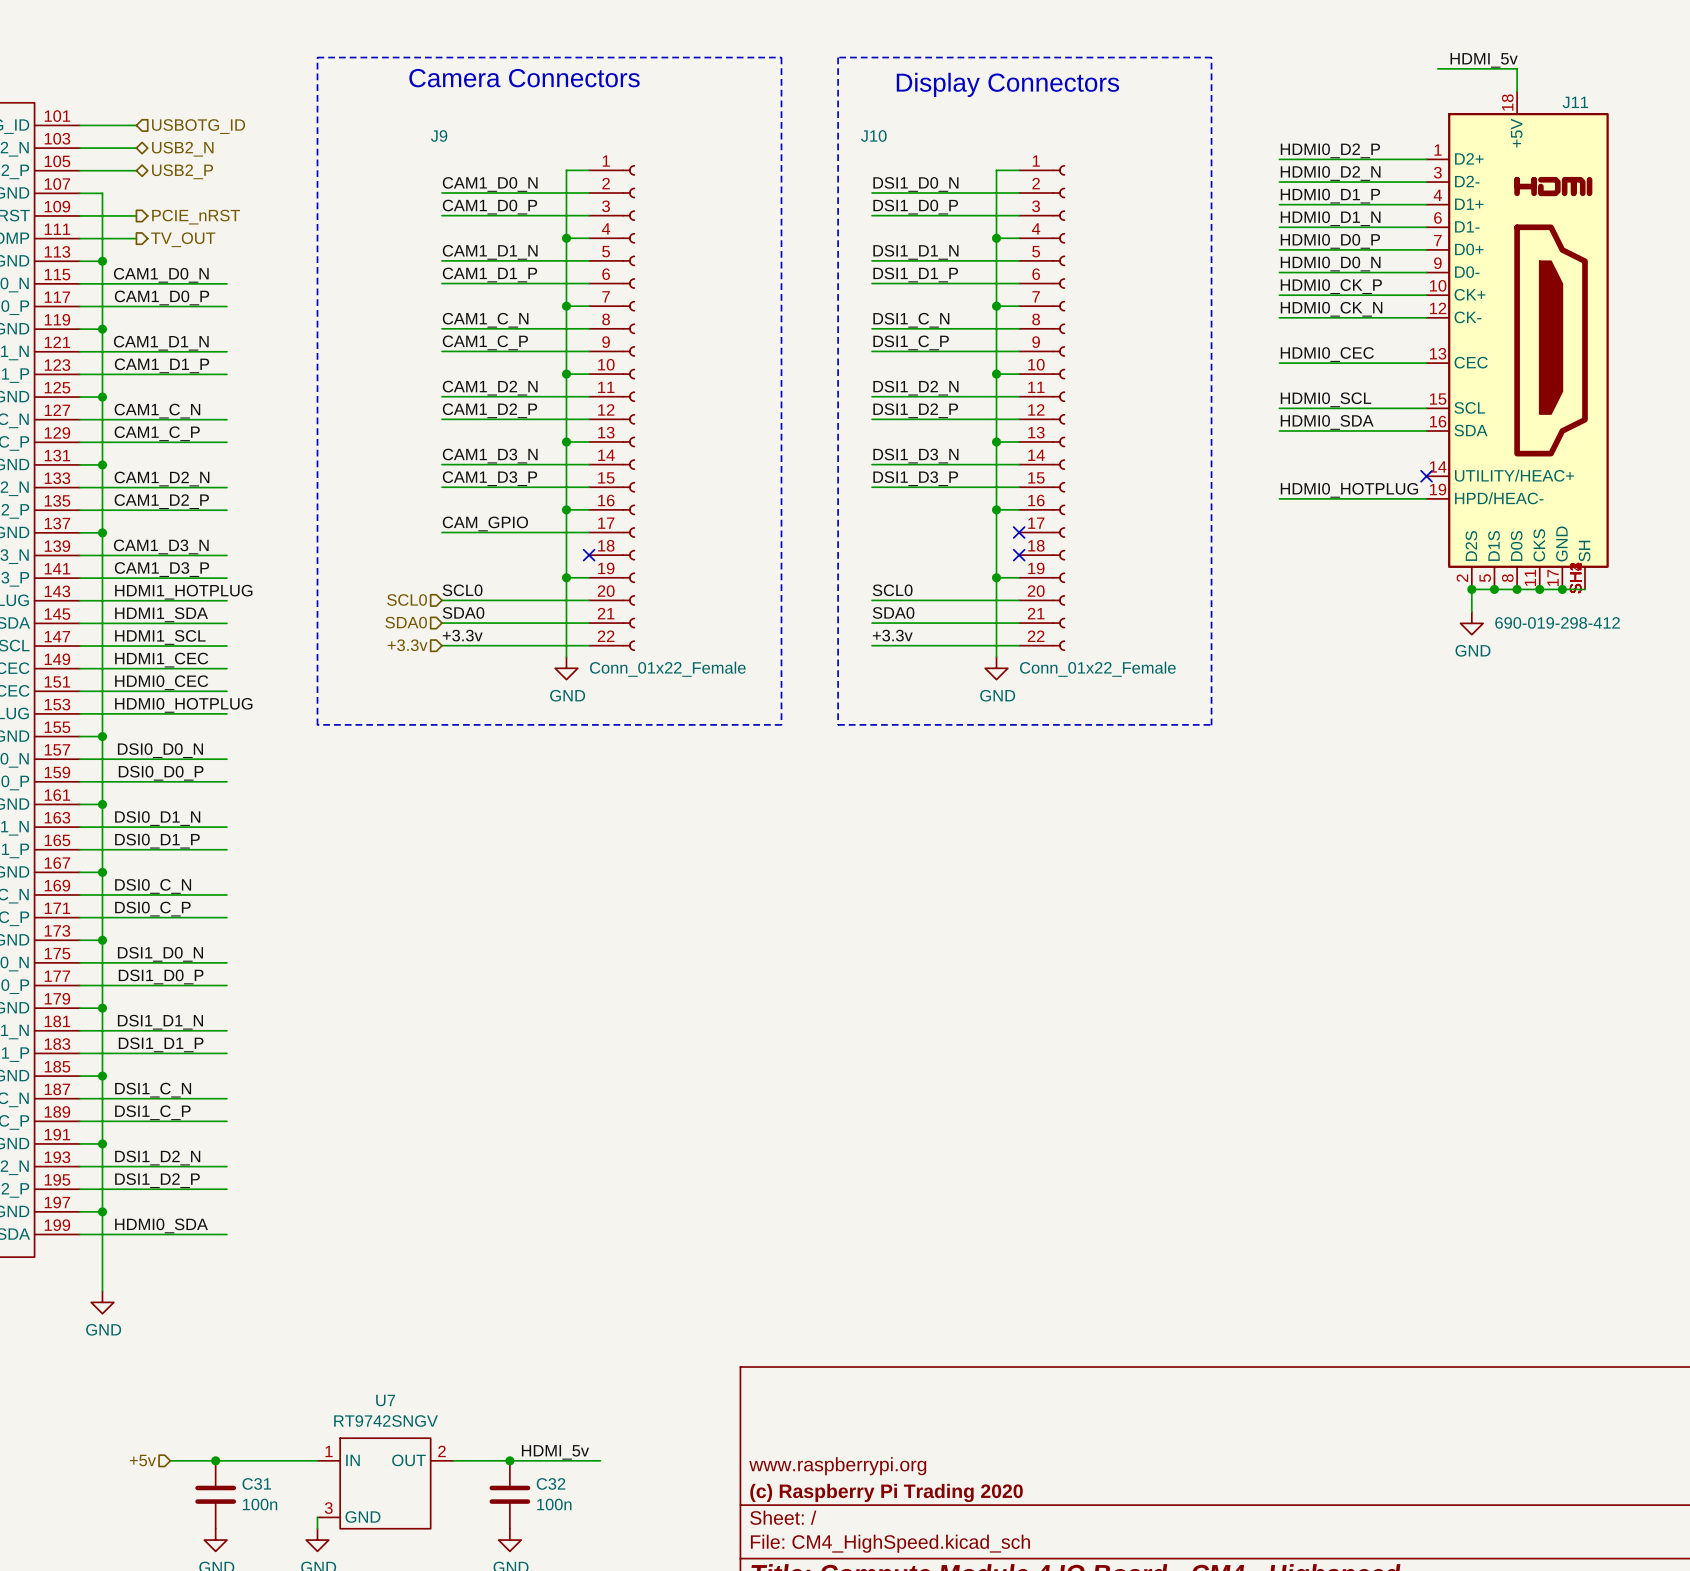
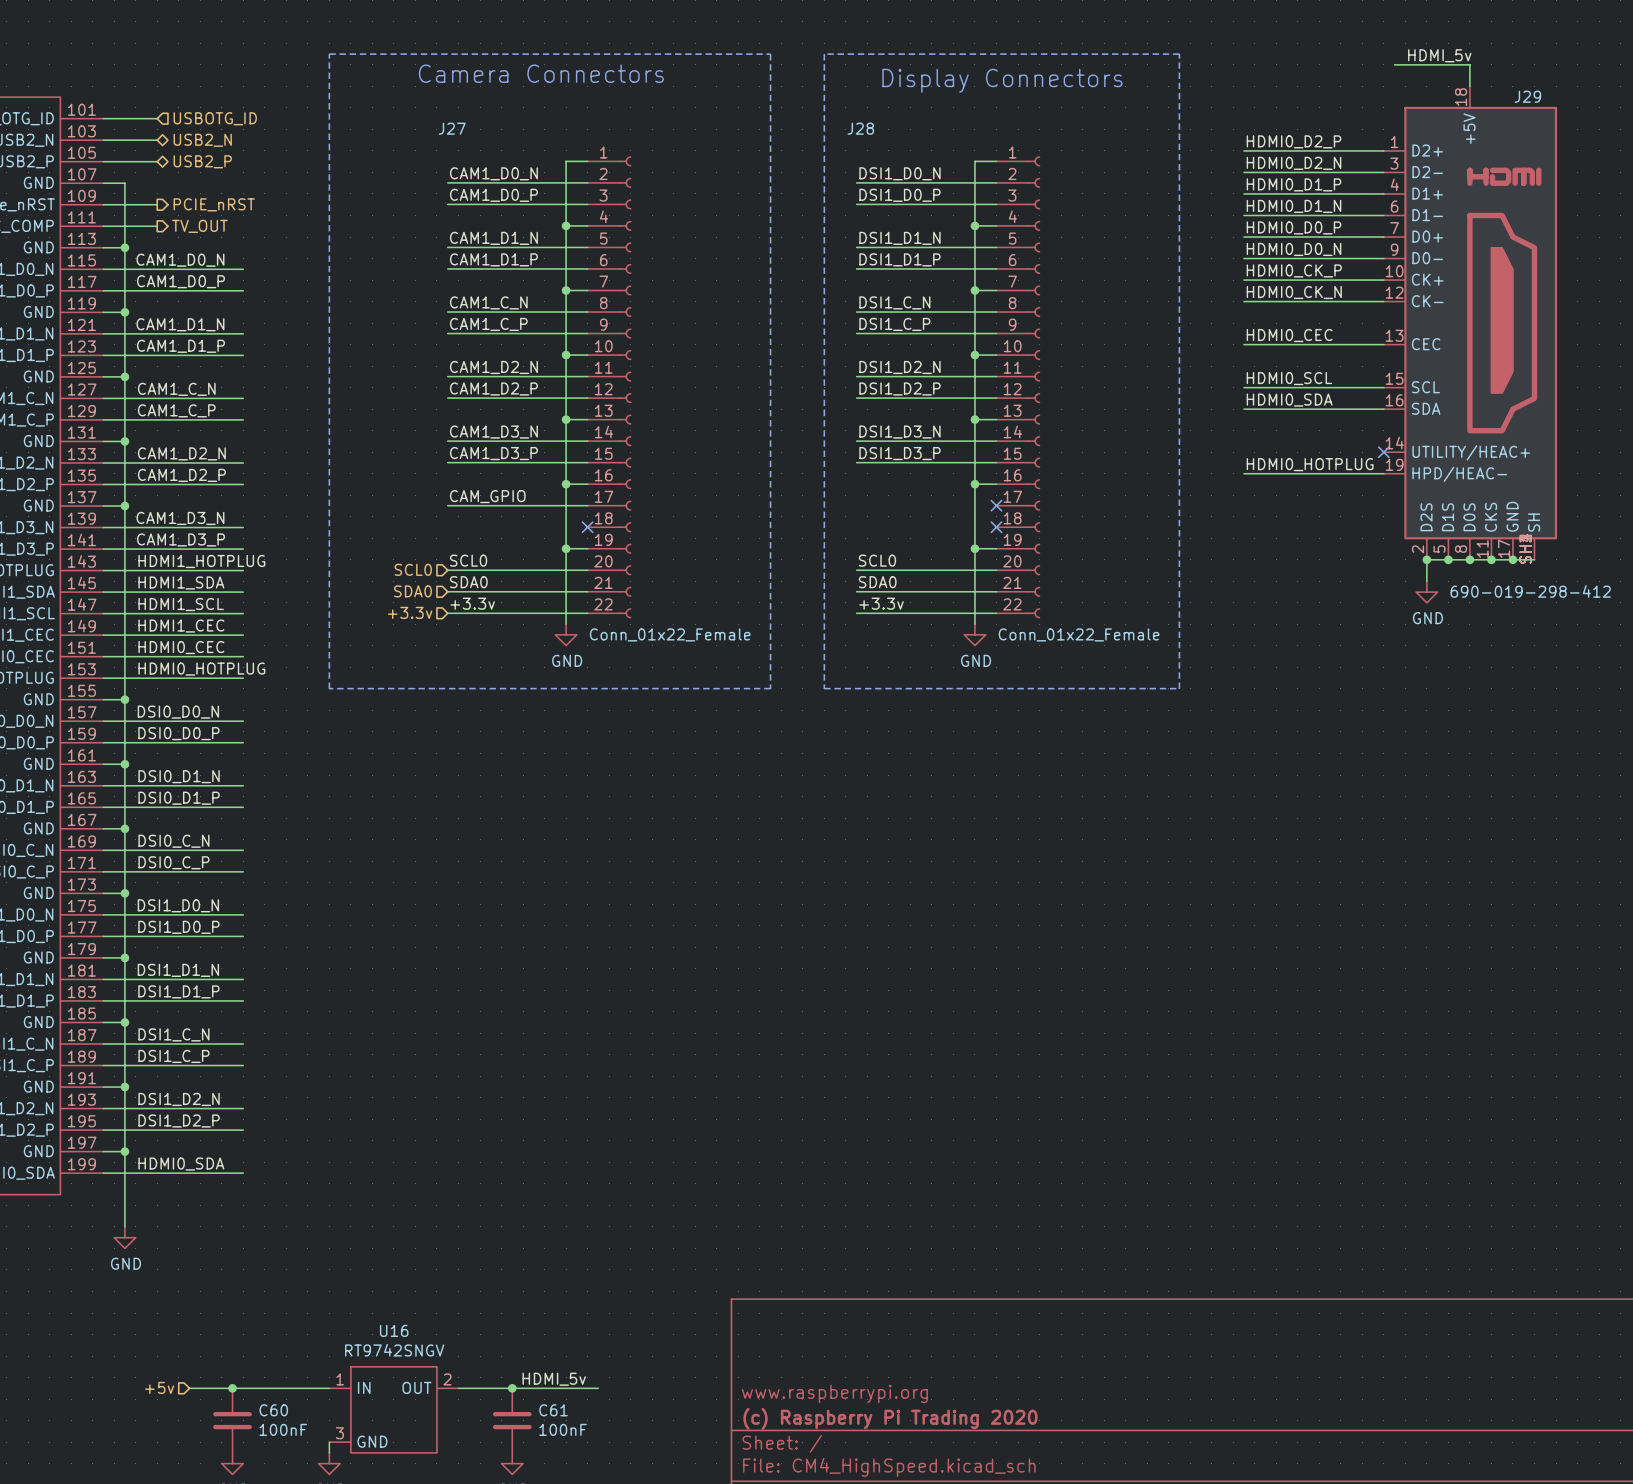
J11 name: J11 (1575, 102) -> J29 (1527, 96)
J9 name: J9 (439, 135) -> J27 (452, 128)
J10 name: J10 (873, 135) -> J28 (860, 128)
U7 name: U7 (385, 1400) -> U16 (394, 1330)
C31 name: C31 (256, 1483) -> C60 (273, 1410)
C32 name: C32 (551, 1483) -> C61 (553, 1410)
C31 value: 100n (260, 1504) -> 100nF (283, 1429)
C32 value: 100n (554, 1504) -> 100nF (562, 1429)

